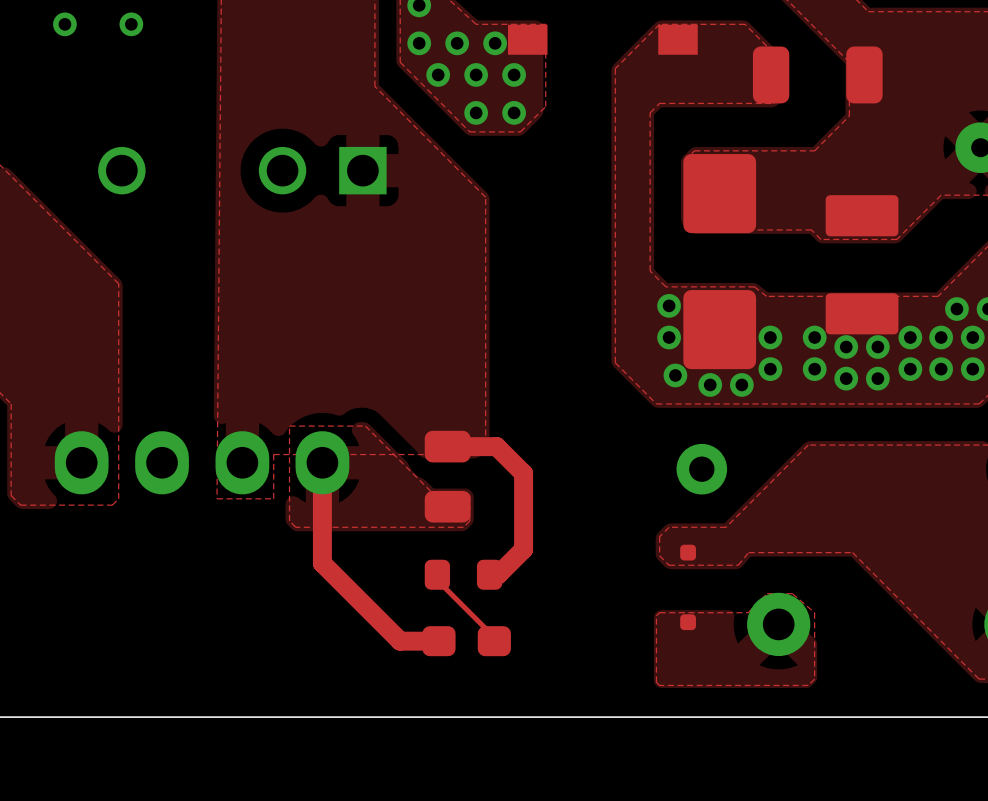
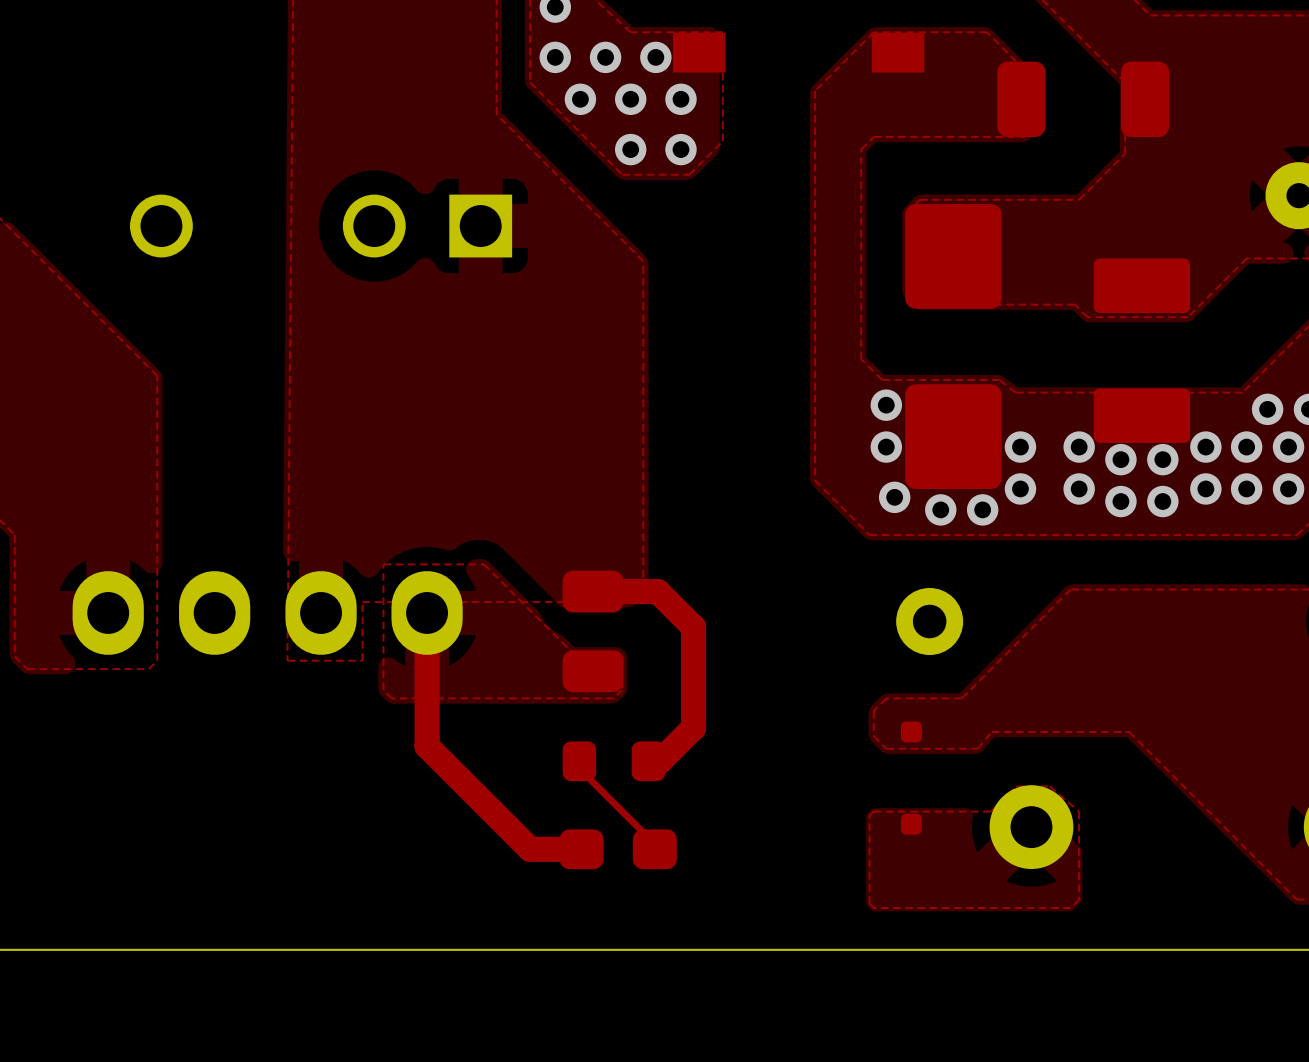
via: (64, 24) -> none
via: (131, 24) -> none

